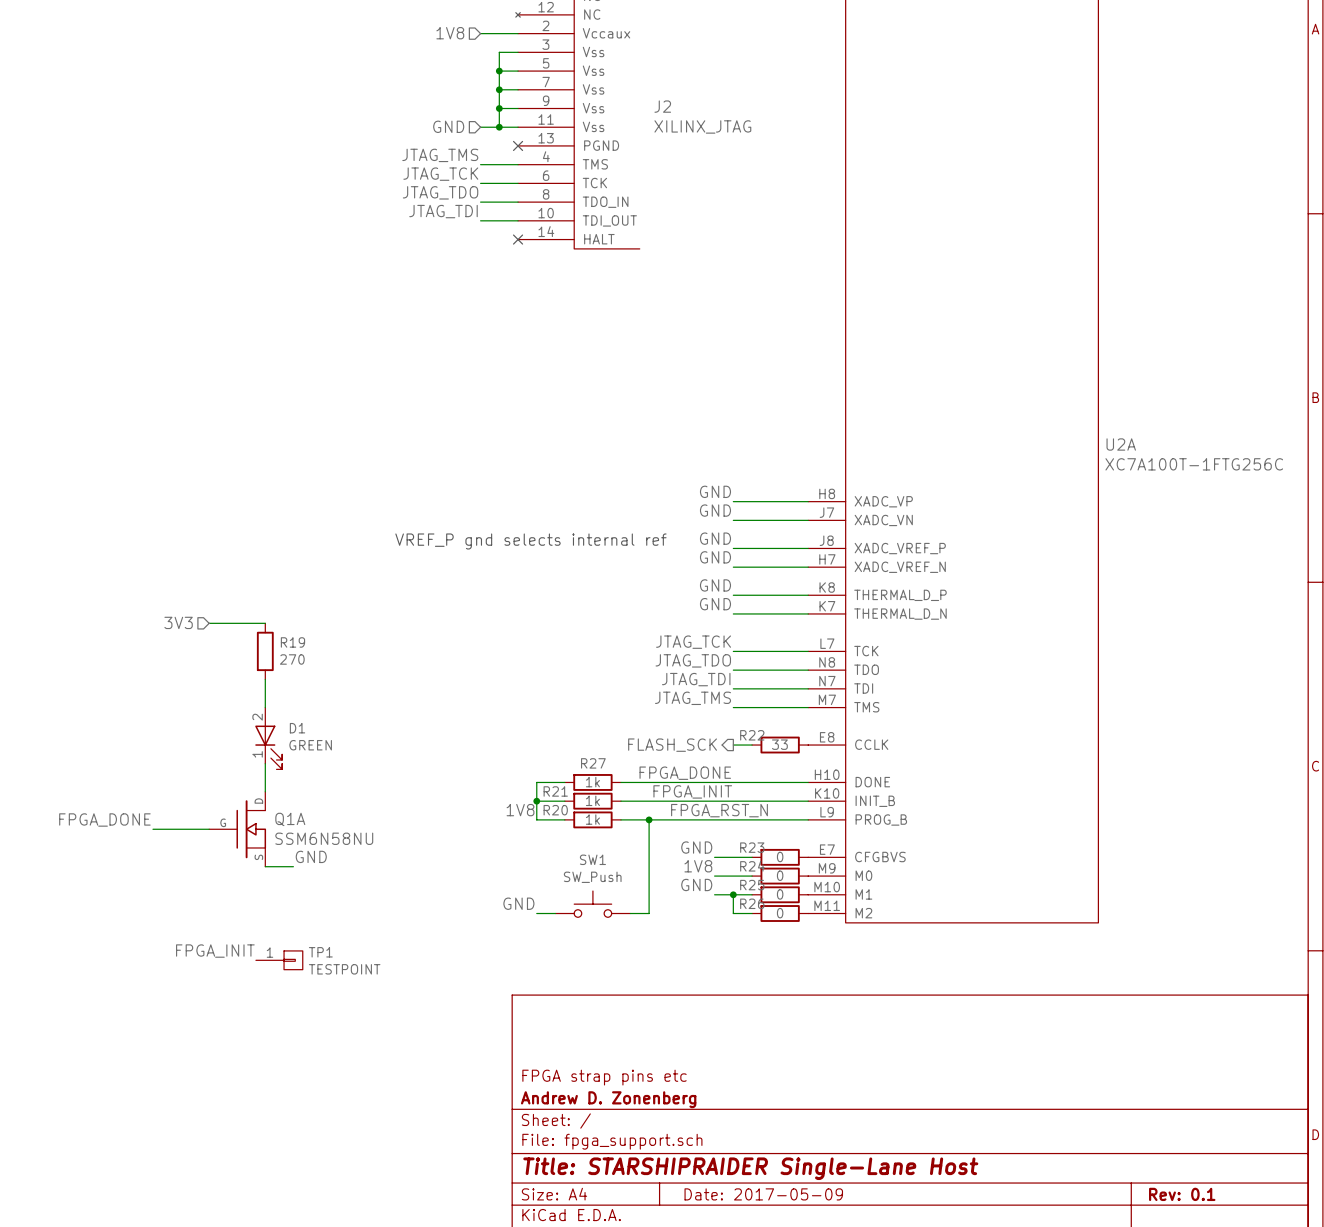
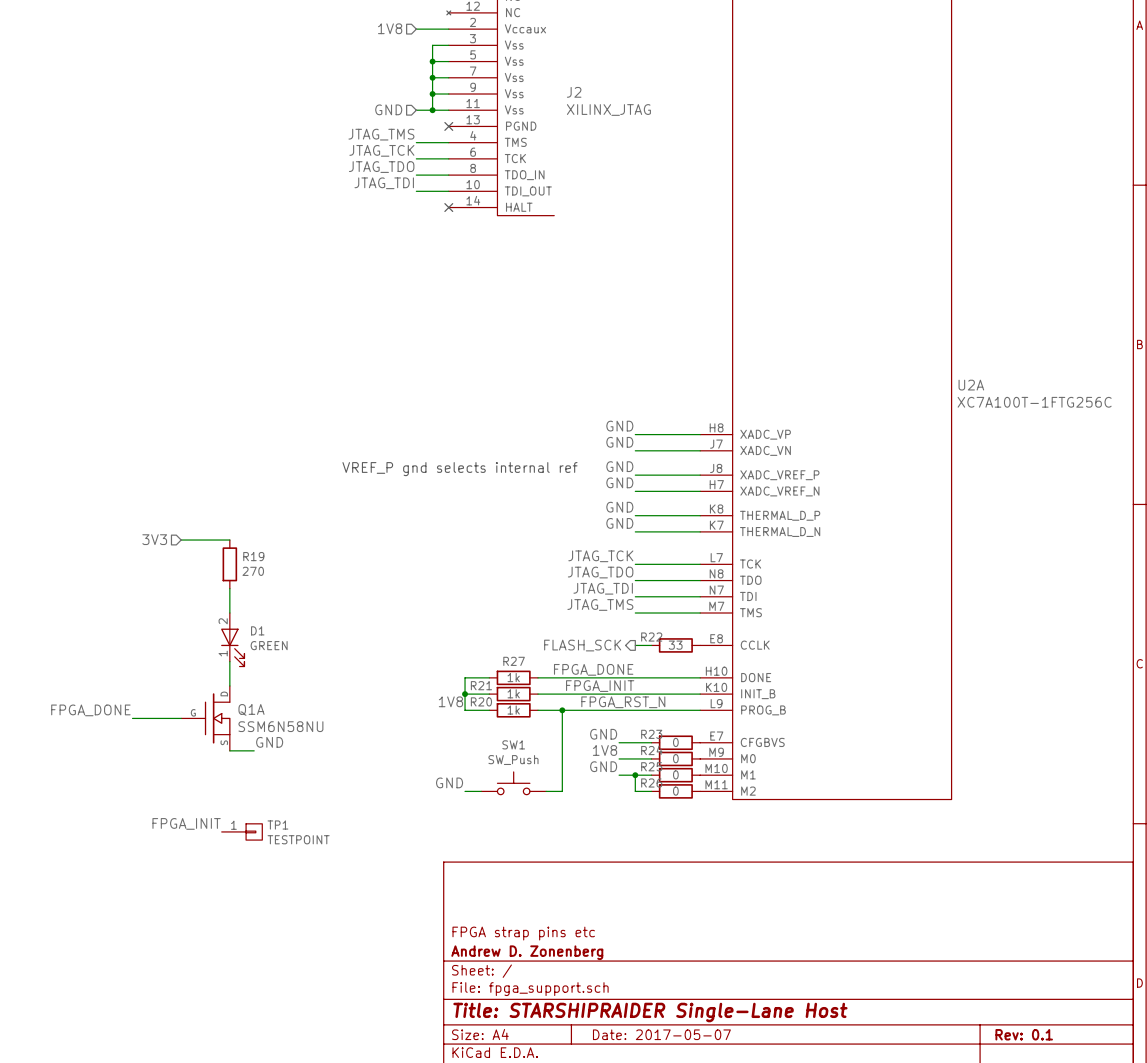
title block: Date: 2017-05-09 (763, 1194) -> Date: 2017-05-07 (661, 1034)

